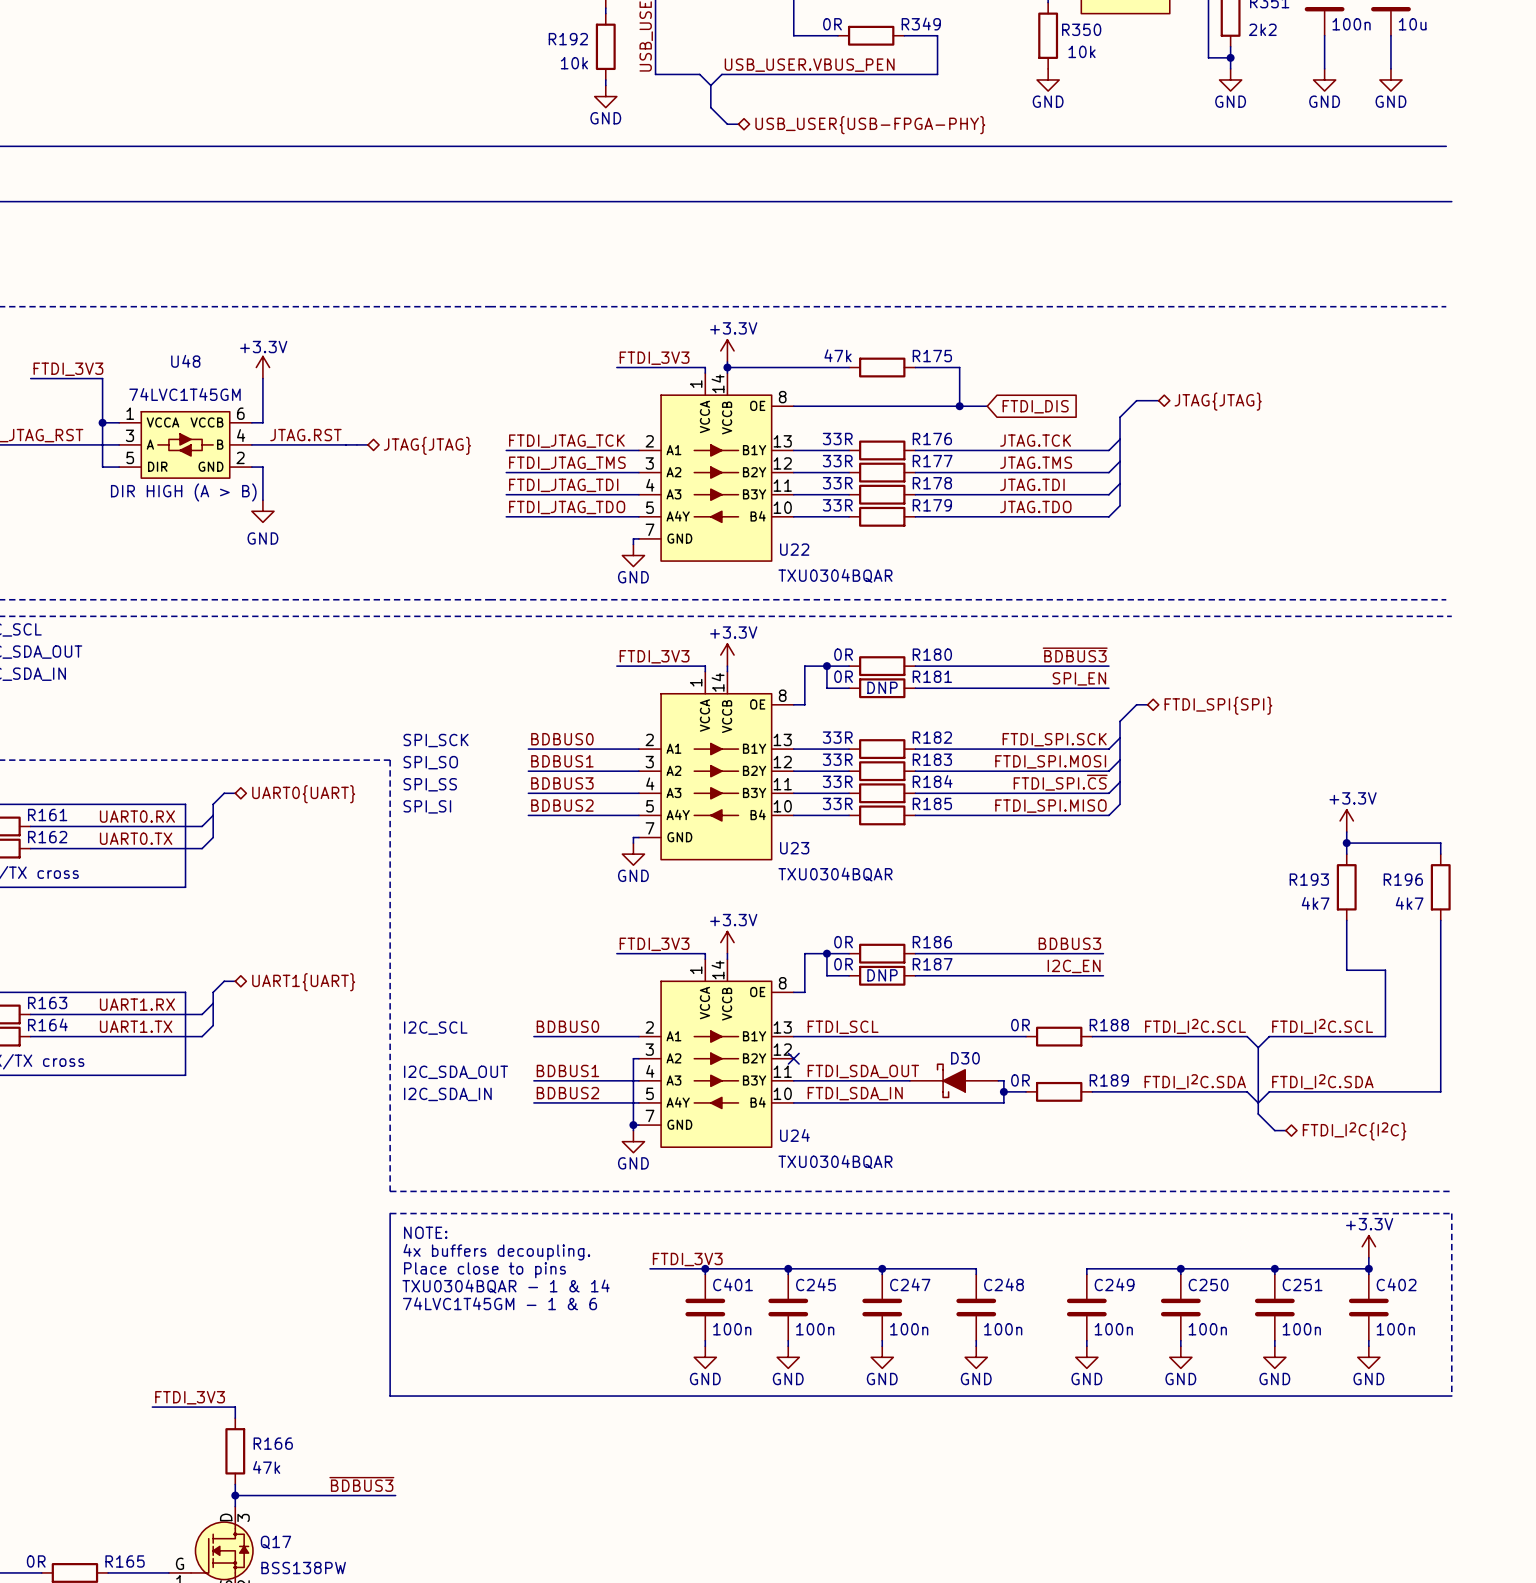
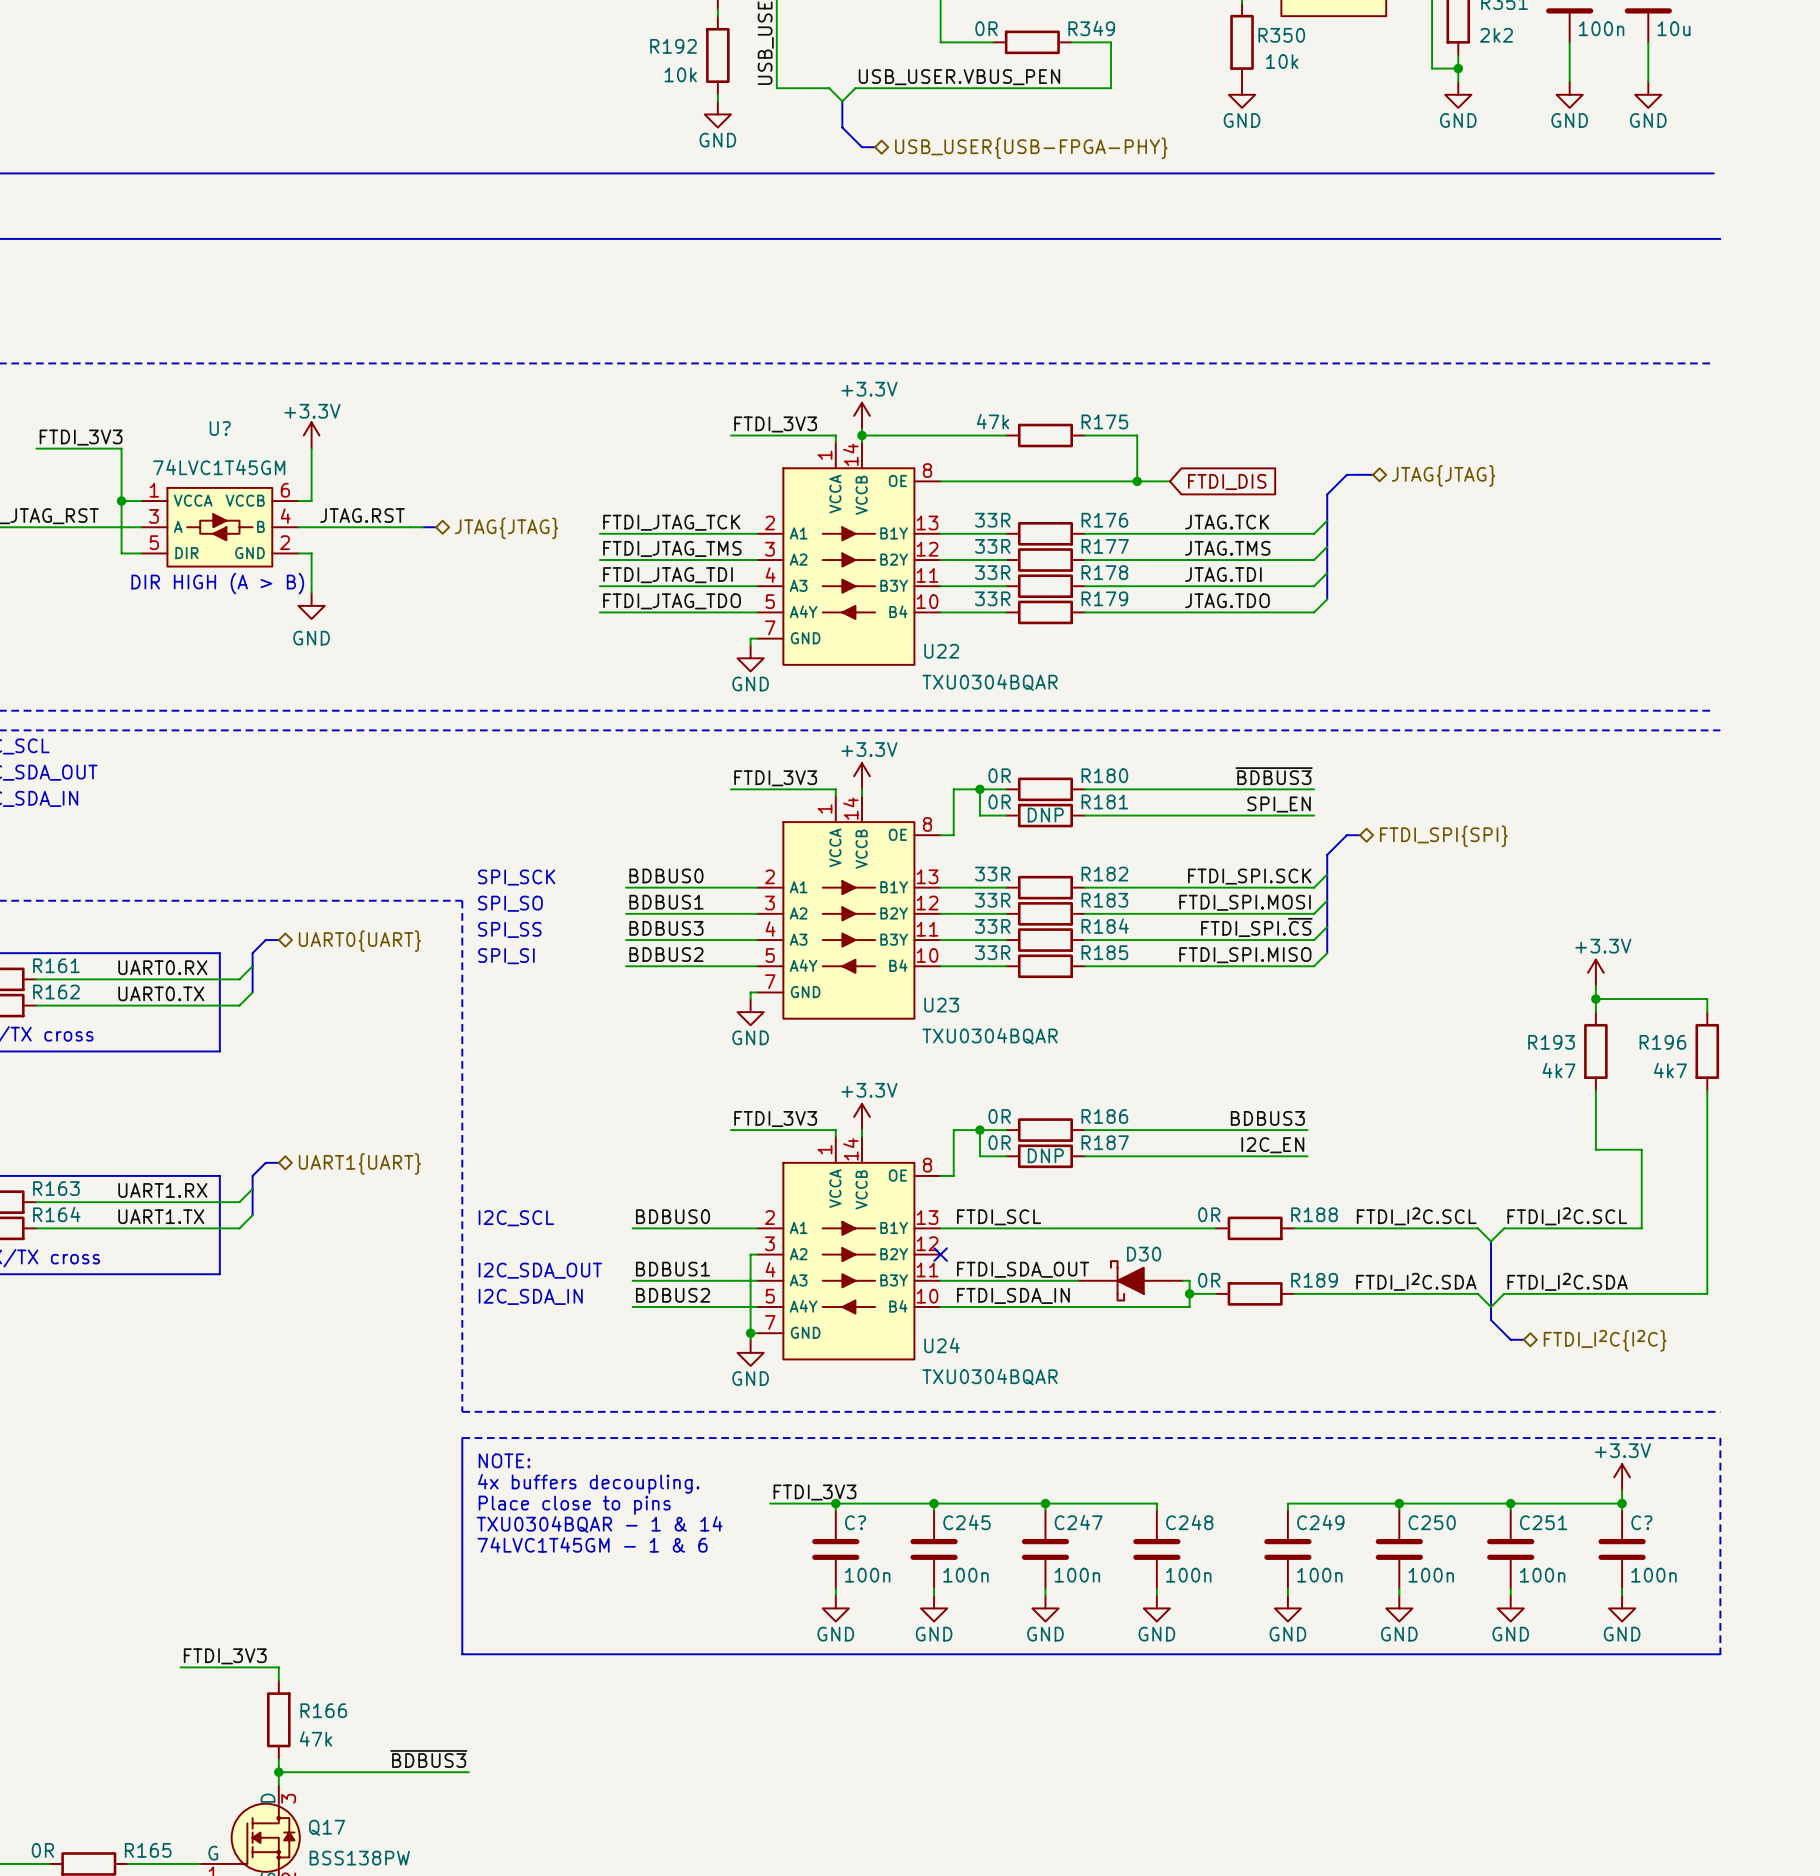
U48 name: U48 (185, 361) -> U? (220, 428)
C401 name: C401 (733, 1284) -> C? (855, 1522)
C402 name: C402 (1396, 1284) -> C? (1641, 1522)

